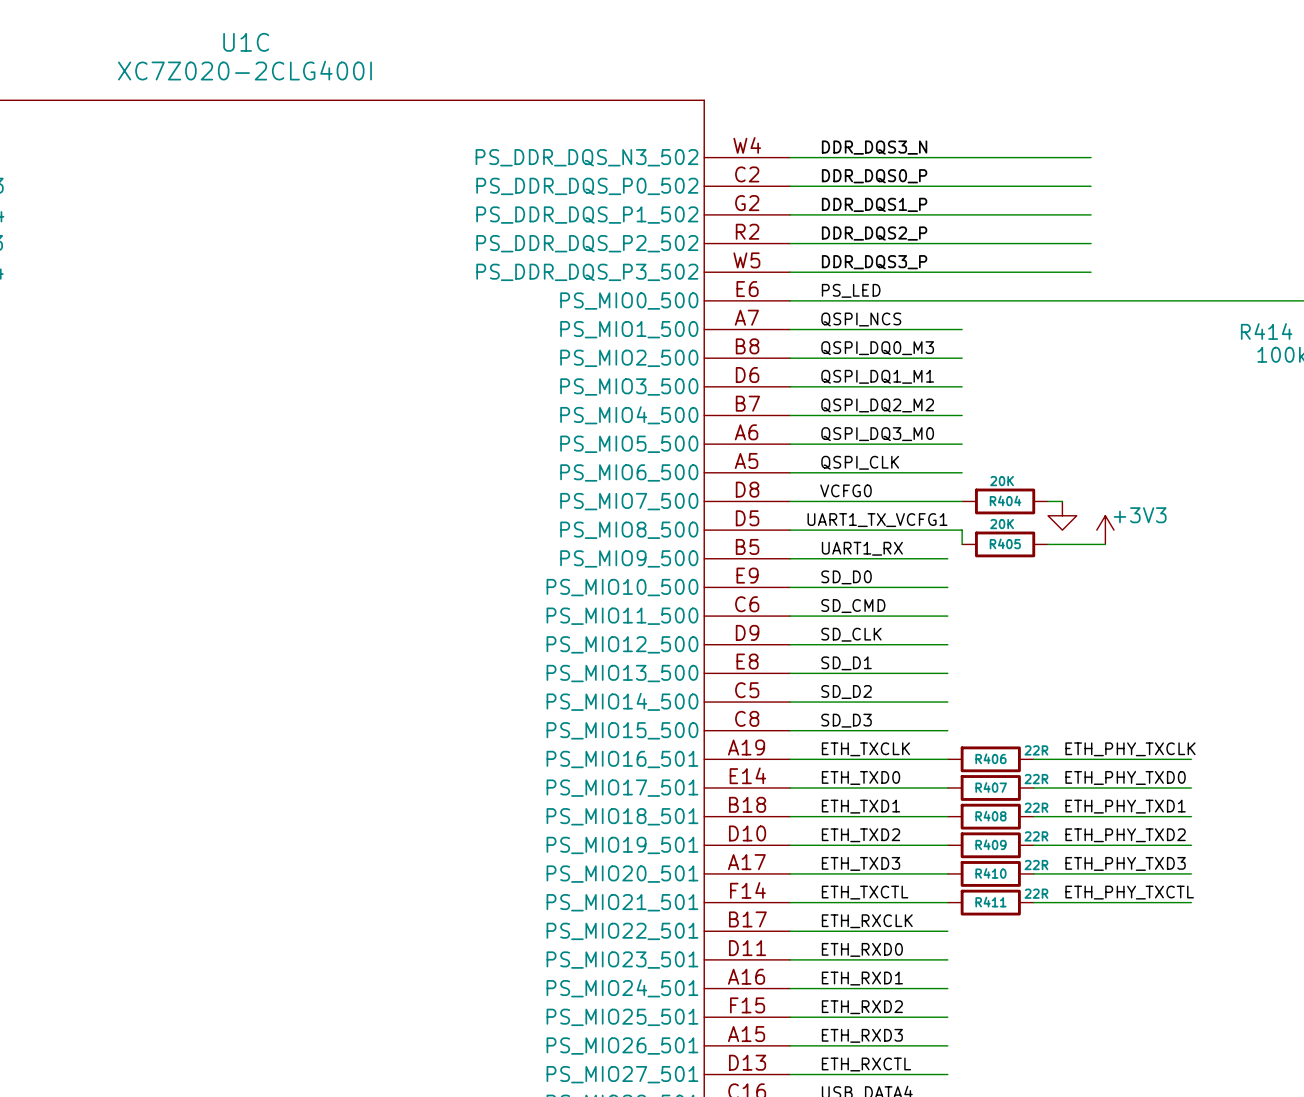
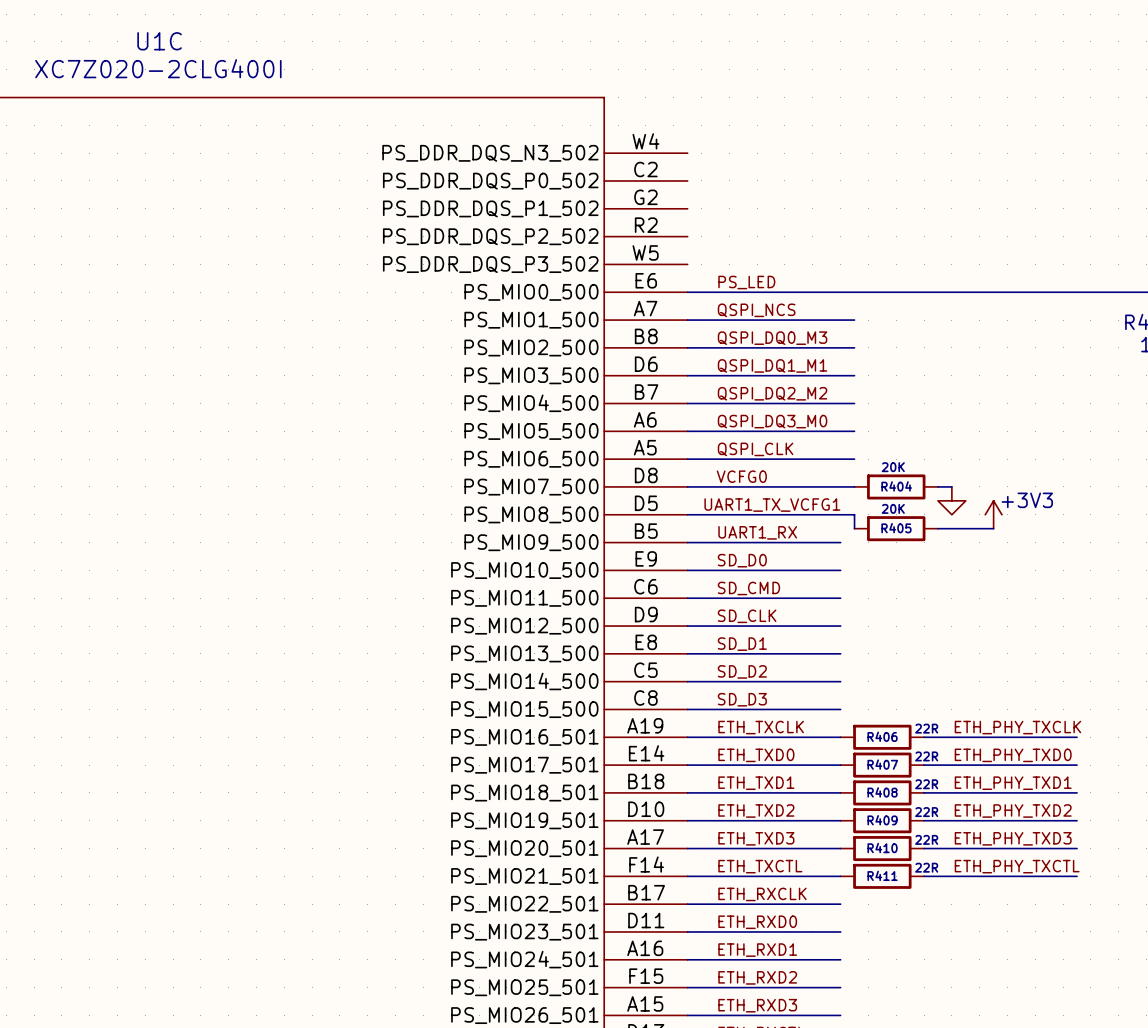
label: DDR_DQS3_N (874, 147) -> none
wire: (790, 157) (1091, 157) -> none
label: DDR_DQS0_P (874, 176) -> none
wire: (790, 186) (1091, 186) -> none
label: DDR_DQS1_P (874, 204) -> none
wire: (790, 214) (1091, 214) -> none
label: DDR_DQS2_P (874, 233) -> none
wire: (790, 243) (1091, 243) -> none
label: DDR_DQS3_P (874, 262) -> none
wire: (790, 272) (1091, 272) -> none

